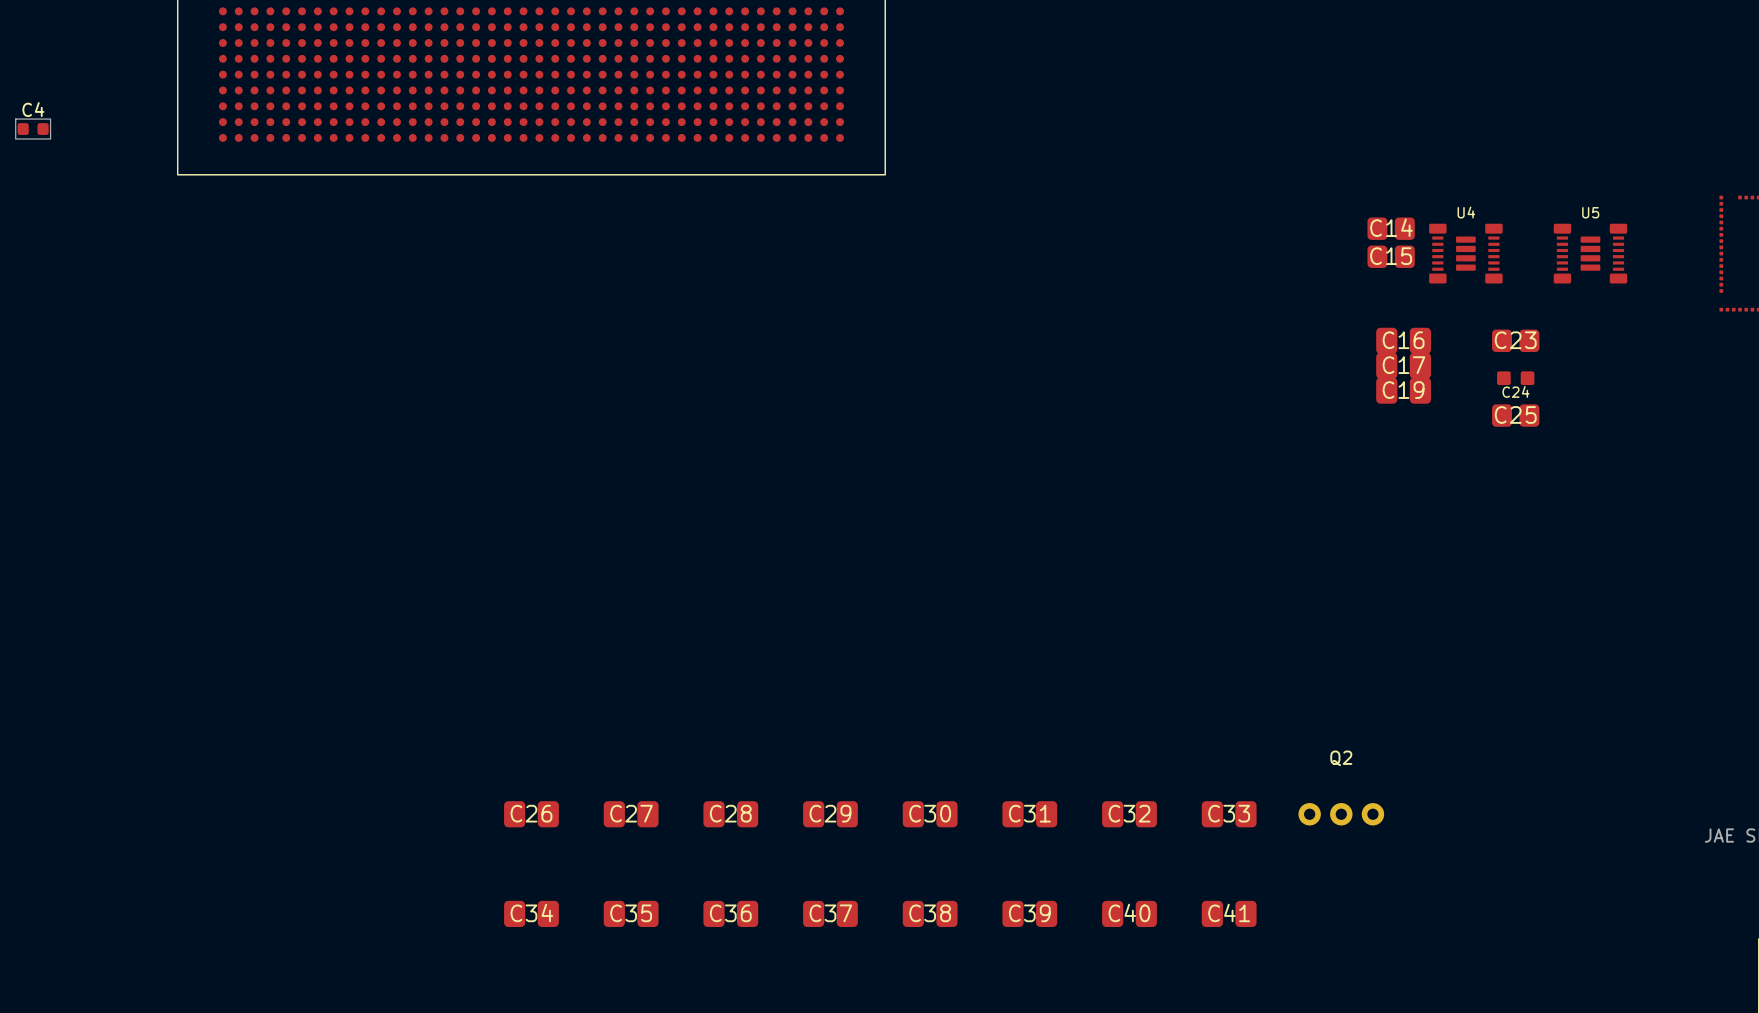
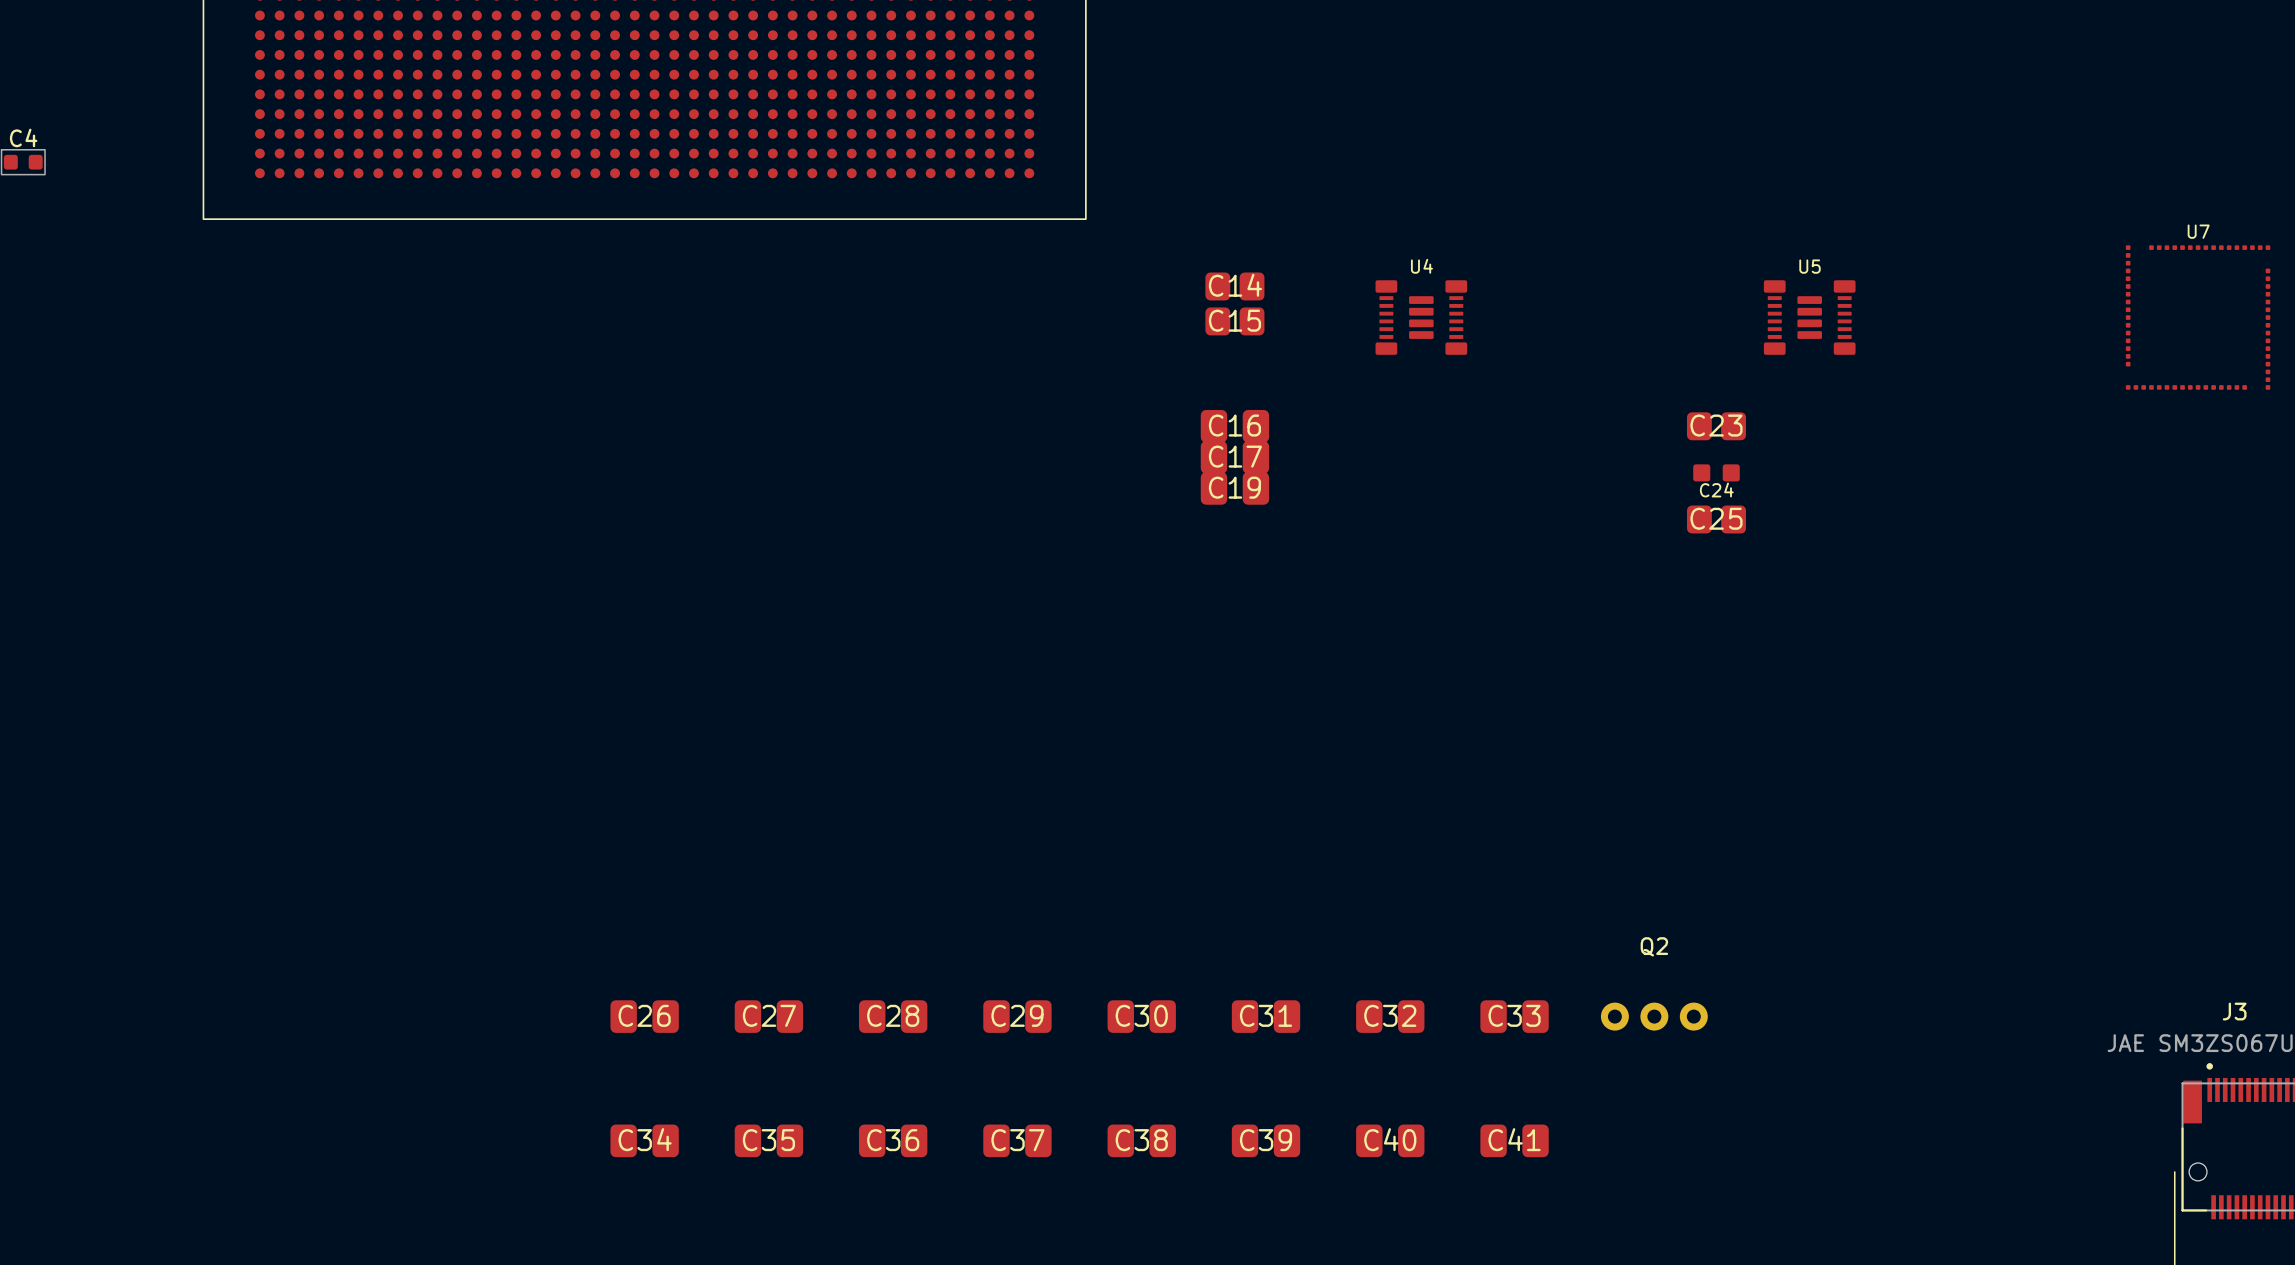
U4 name: U4 (1466, 212) -> U5 (1810, 266)
C14 position: (1391, 228) -> (1234, 286)
U4: none -> (1421, 317)
U5: (1590, 253) -> none
C15 position: (1391, 256) -> (1234, 321)
C16 position: (1403, 340) -> (1234, 426)
C23 position: (1515, 340) -> (1716, 426)
C17 position: (1403, 365) -> (1234, 457)
C24 position: (1515, 378) -> (1716, 472)
C19 position: (1403, 390) -> (1234, 488)
C25 position: (1515, 415) -> (1716, 519)

